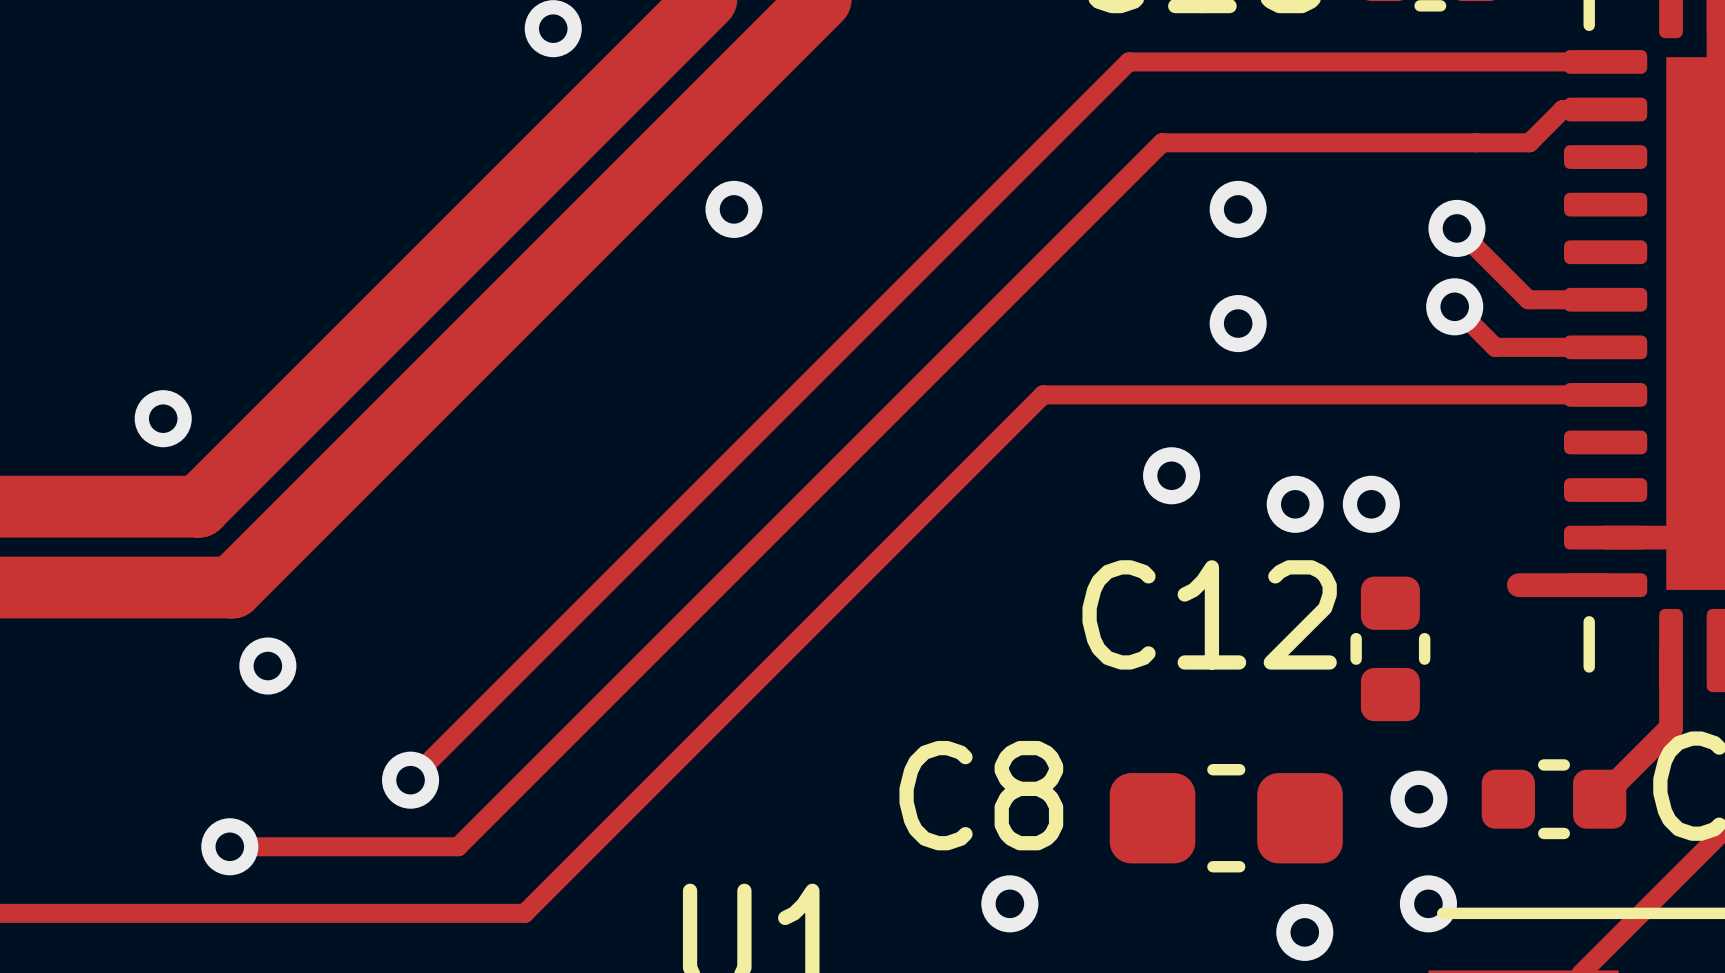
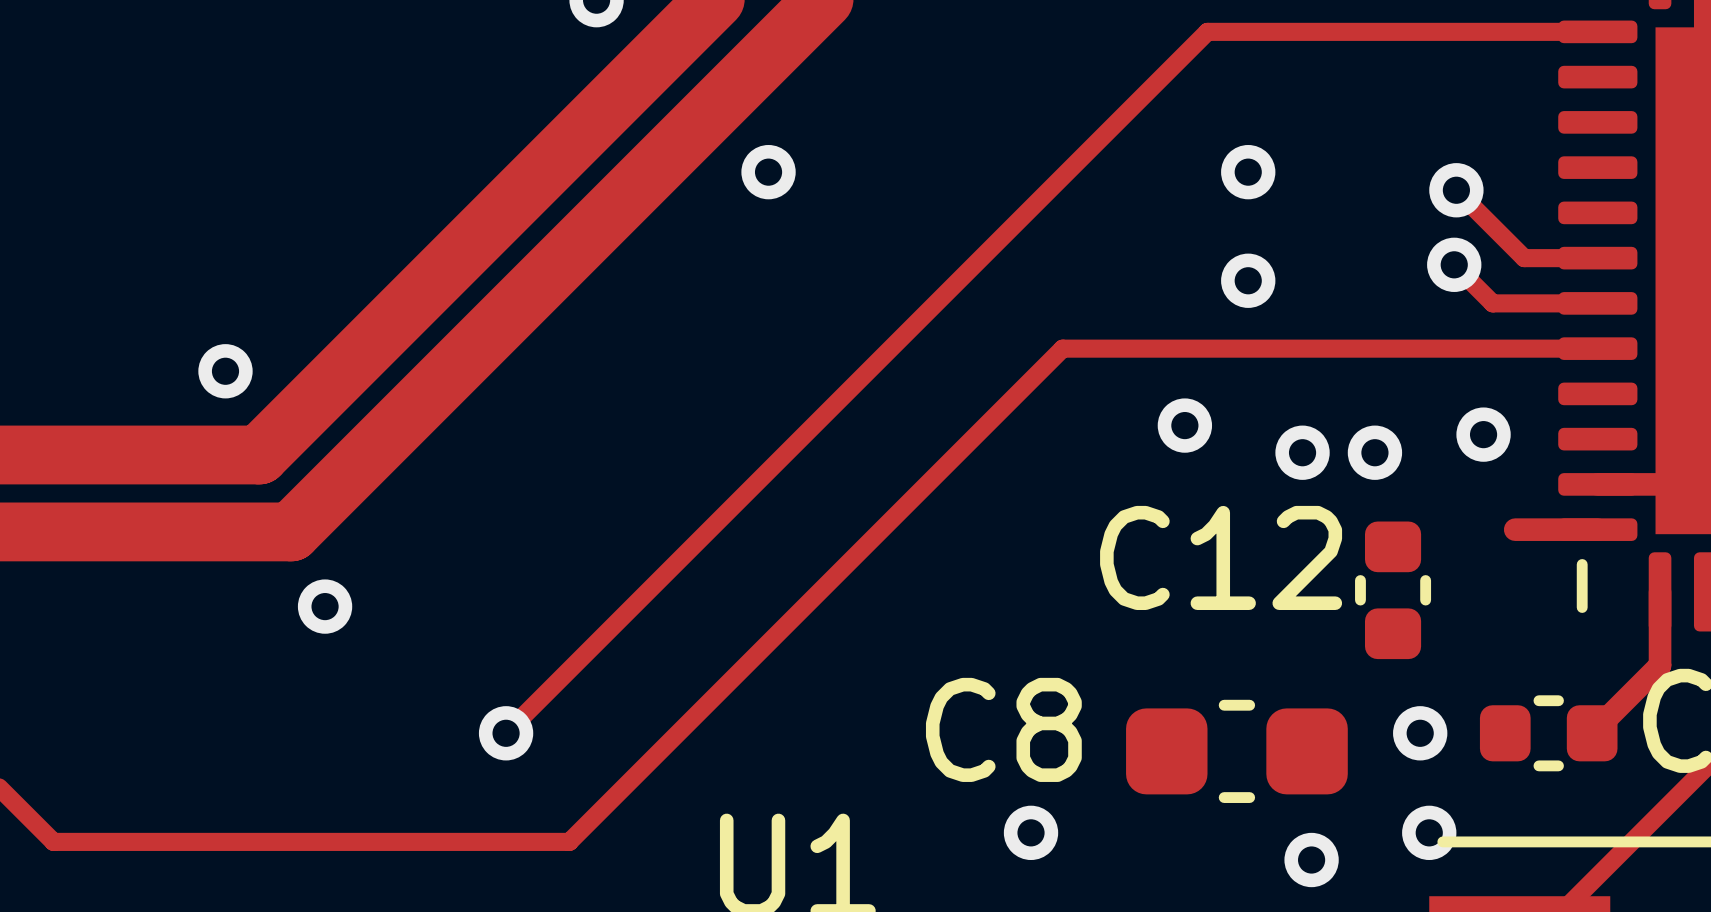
track: (1195, 61) (1128, 61) (410, 780) -> (1207, 31) (506, 733)
track: (1605, 109) (1562, 109) (1529, 142) (1162, 142) (458, 846) (229, 846) -> none
via: none -> (1483, 434)
via position: (410, 780) -> (506, 733)
via: (229, 846) -> none

